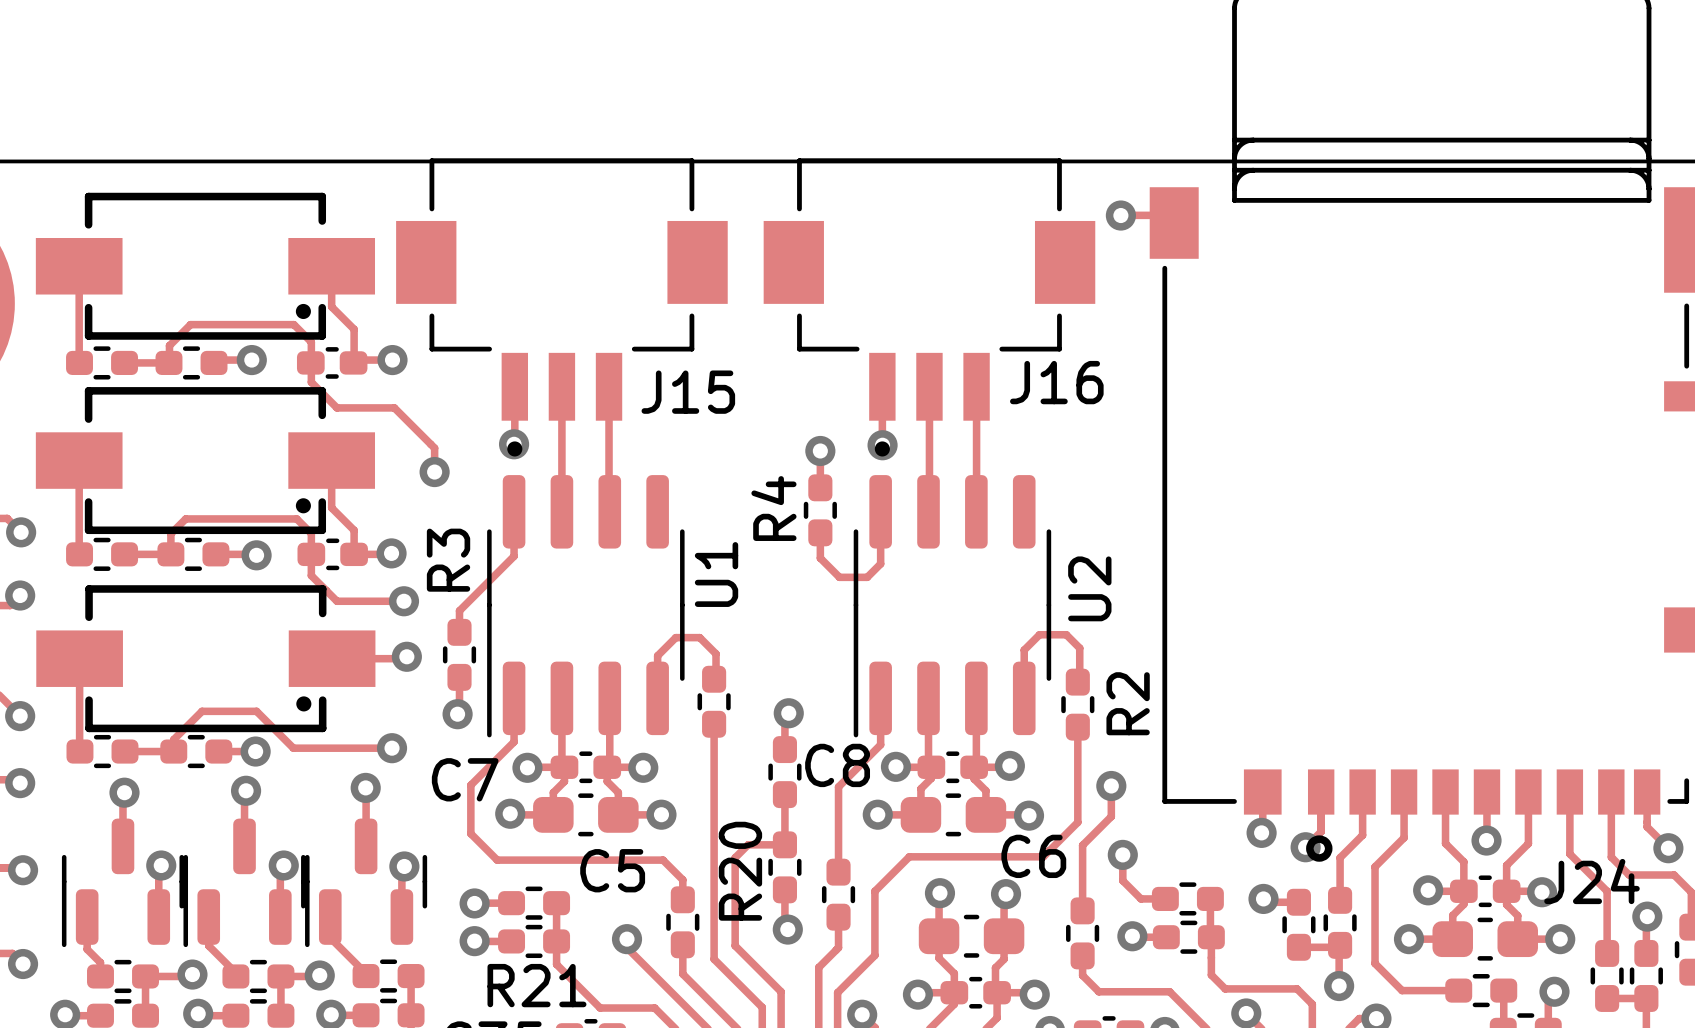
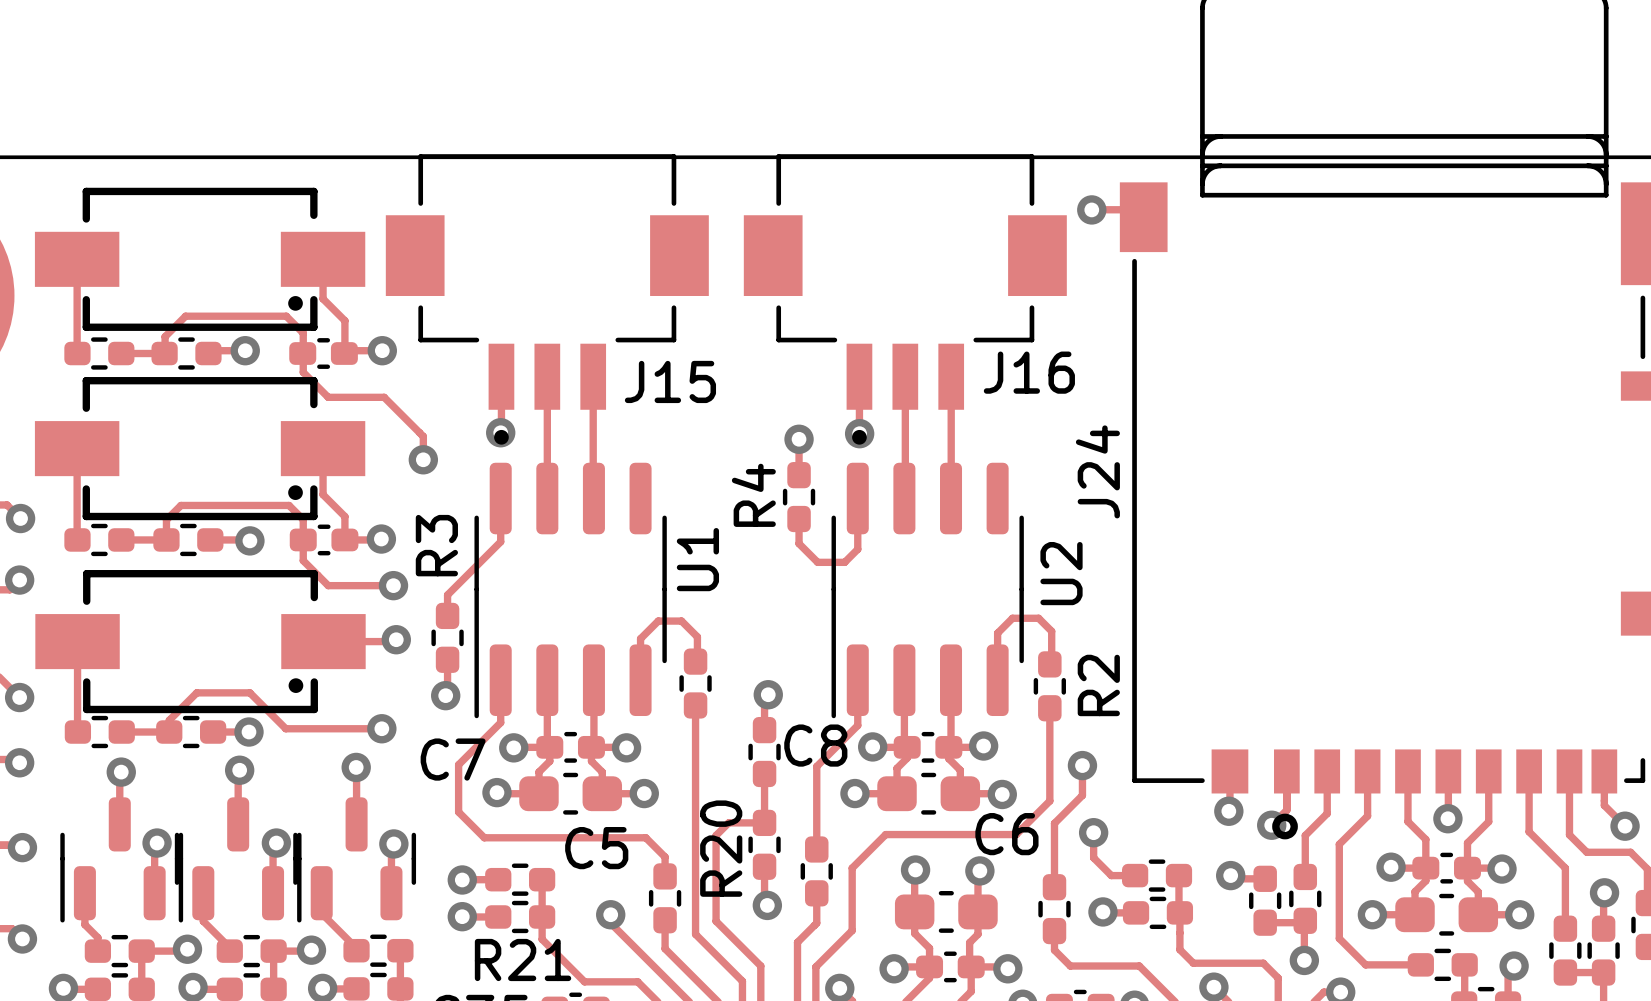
J24 name rotation: 0° (1591, 881) -> 90° counterclockwise (1097, 471)
J24 name position: J24 (1591, 881) -> J24 (1097, 471)

